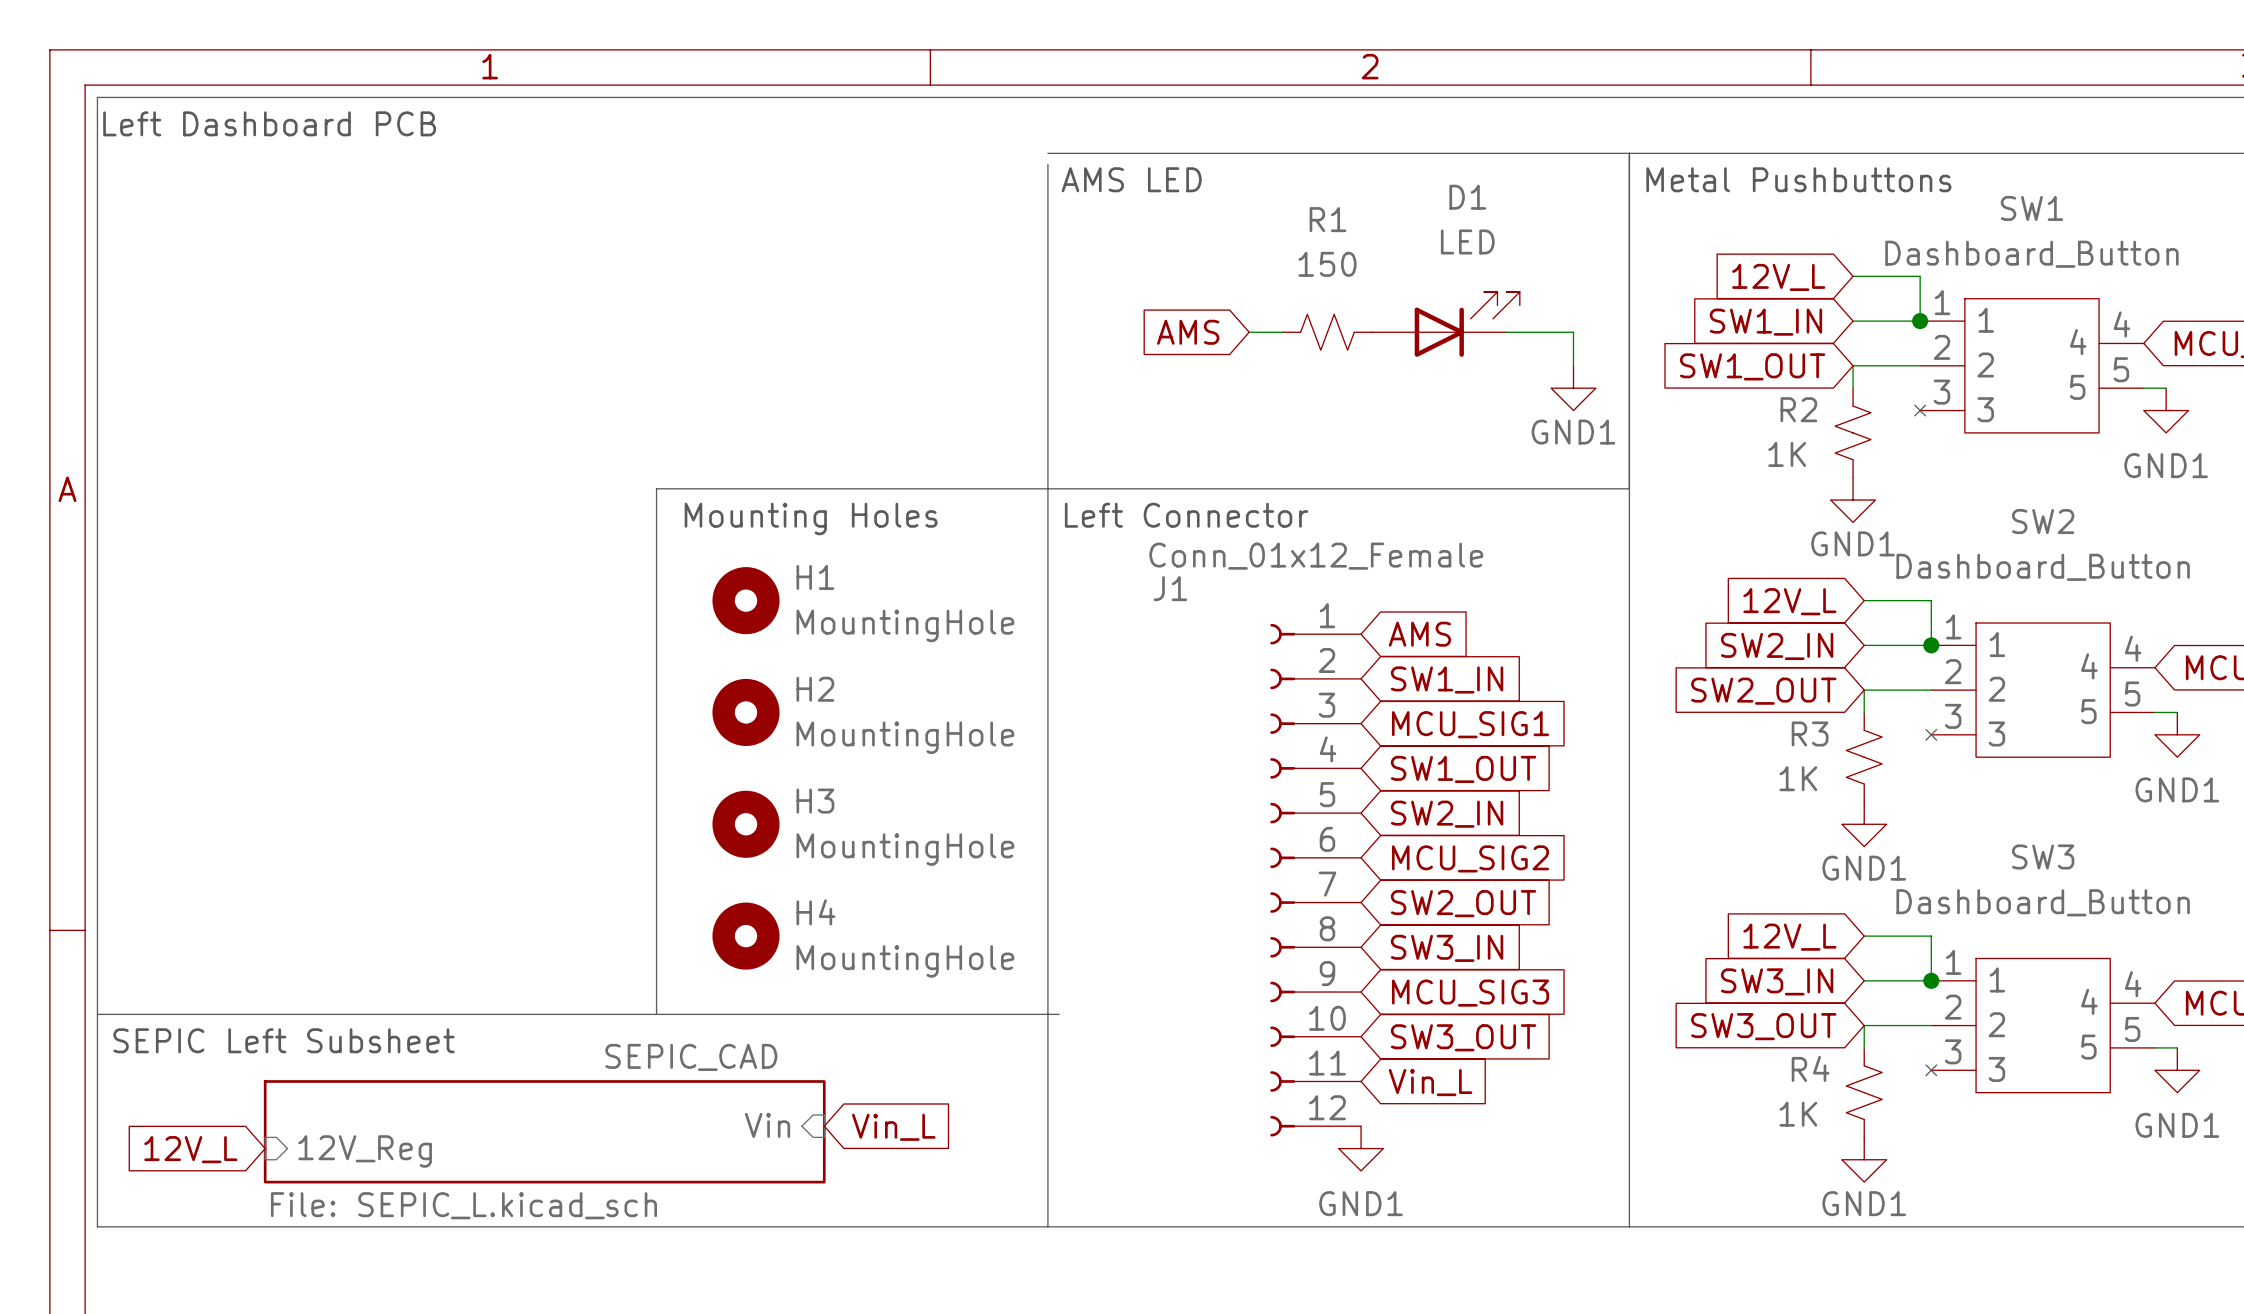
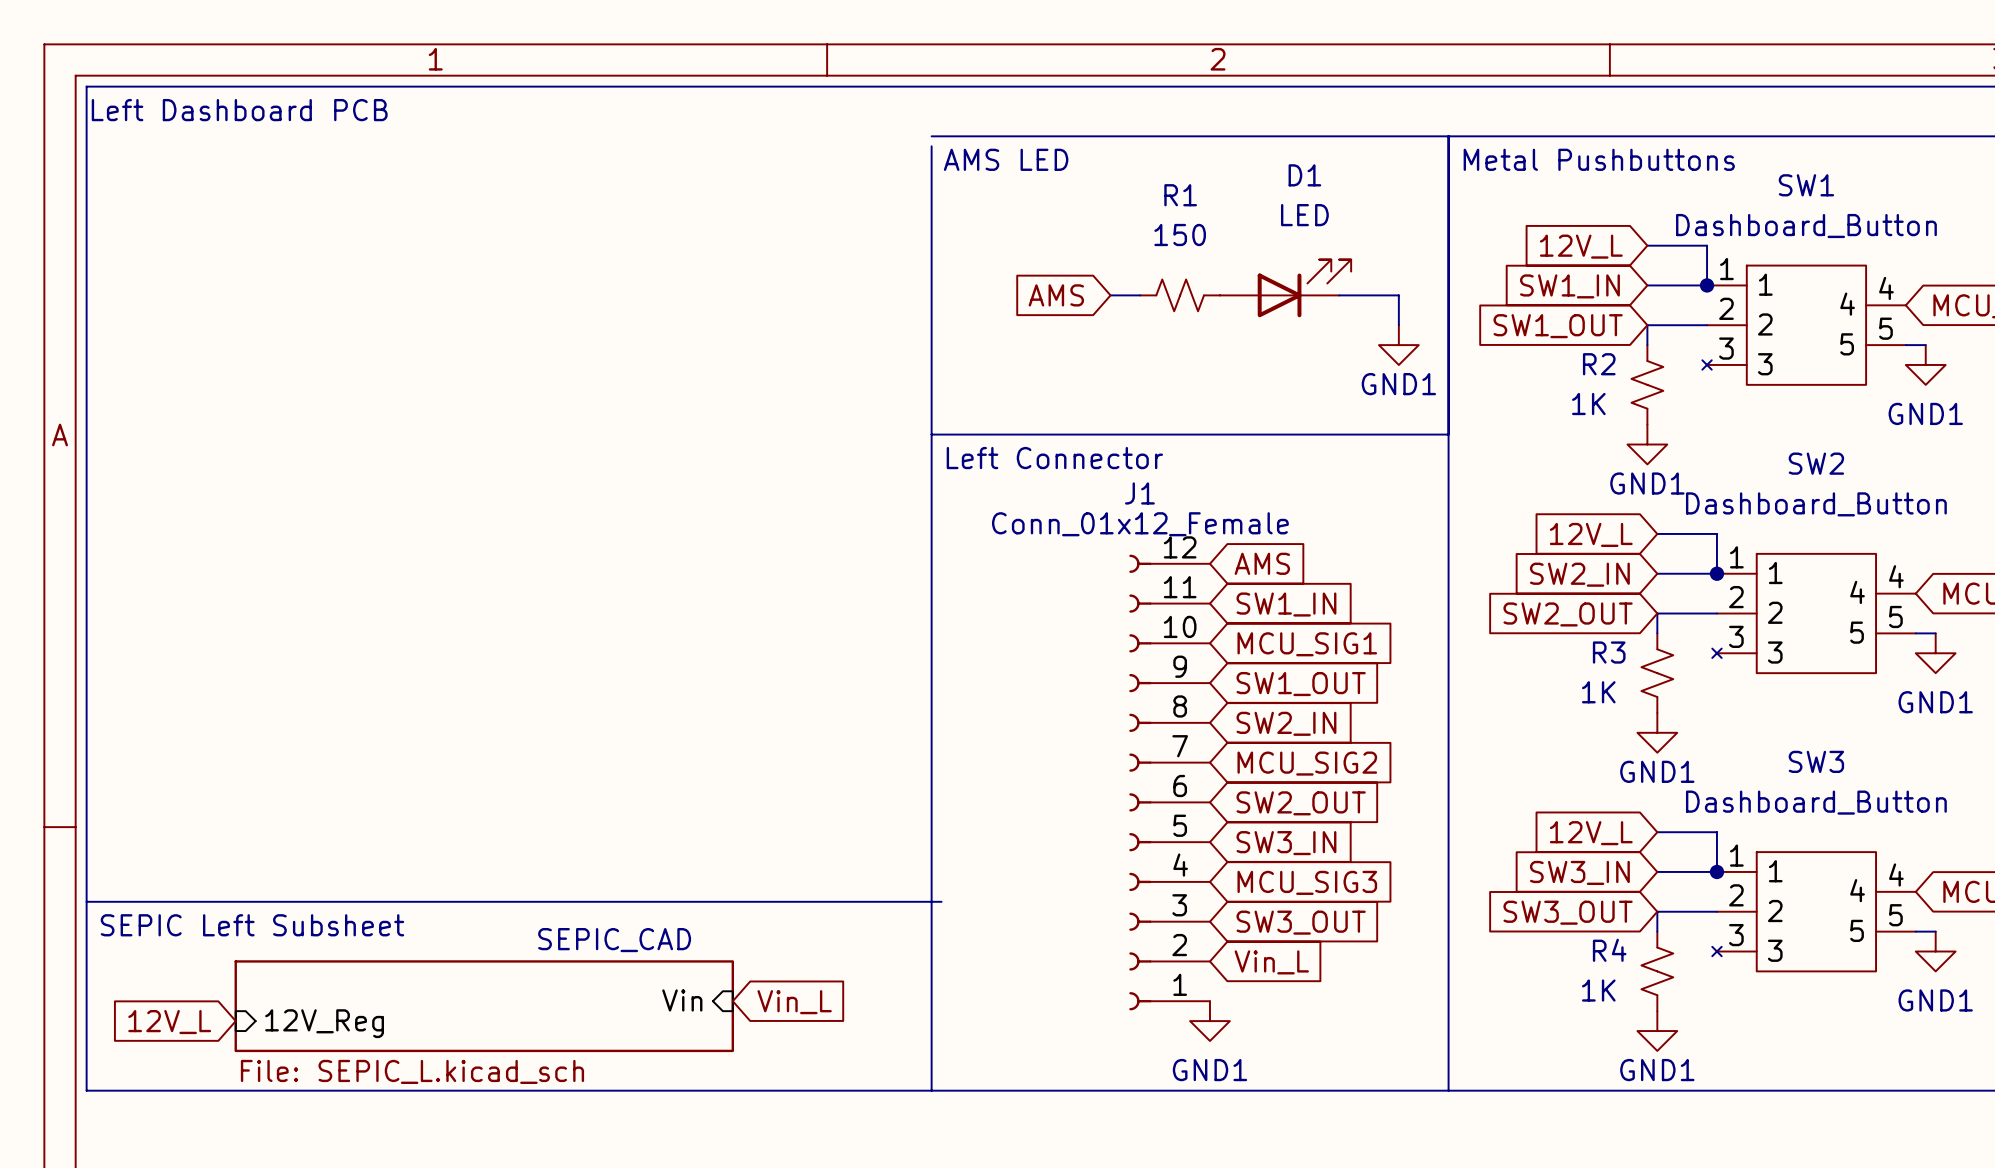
line: (1047, 488) (656, 488) (656, 1014) -> none
text: Mounting Holes (811, 518) -> none
J1 value position: Conn_01x12_Female (1316, 556) -> Conn_01x12_Female (1140, 524)
J1 name position: J1 (1170, 588) -> J1 (1139, 493)
H1: MountingHole (746, 600) -> none
H2: MountingHole (746, 712) -> none
H3: MountingHole (746, 824) -> none
J1 flip: as is (1282, 880) -> up-down (1140, 782)
H4: MountingHole (746, 936) -> none

